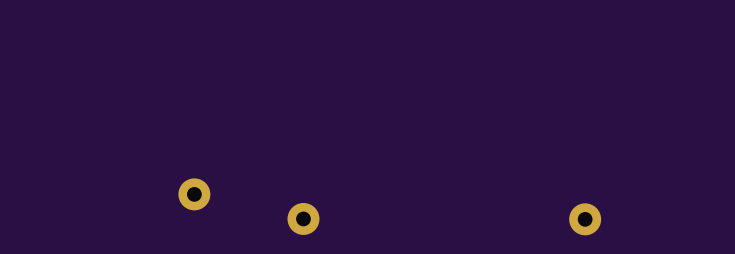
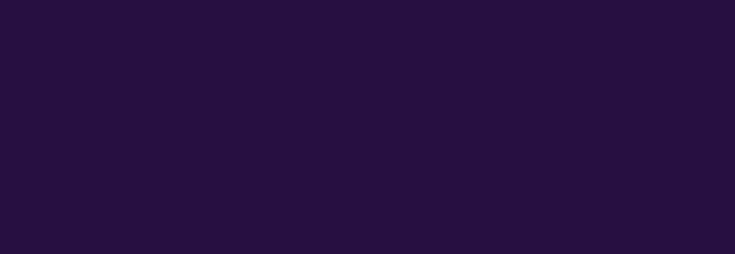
via: (194, 194) -> none
via: (303, 218) -> none
via: (585, 219) -> none

